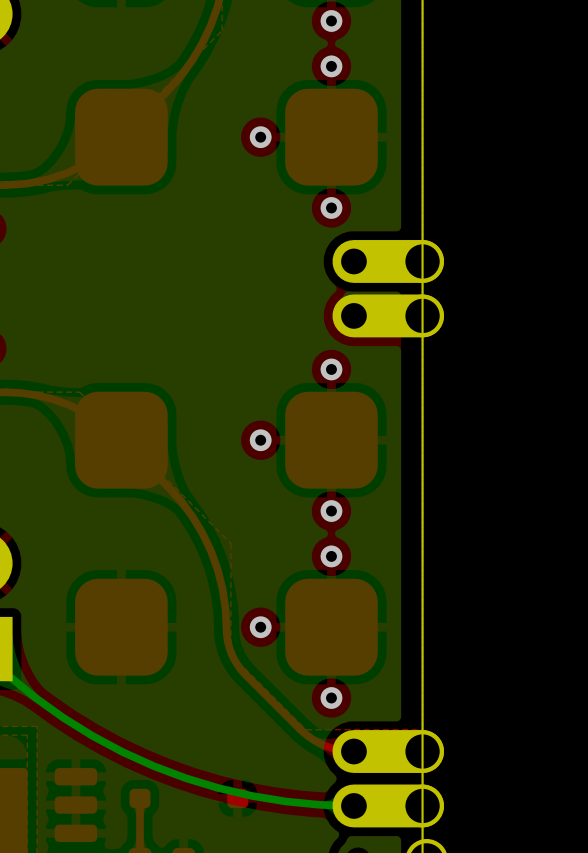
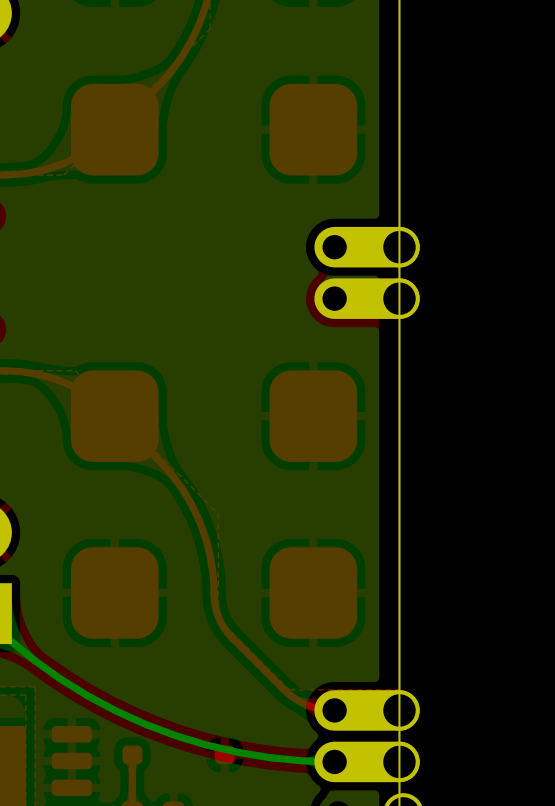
via: (331, 20) -> none
via: (331, 66) -> none
via: (260, 137) -> none
via: (331, 207) -> none
via: (331, 369) -> none
via: (260, 440) -> none
via: (331, 511) -> none
via: (331, 556) -> none
via: (260, 627) -> none
via: (331, 698) -> none

